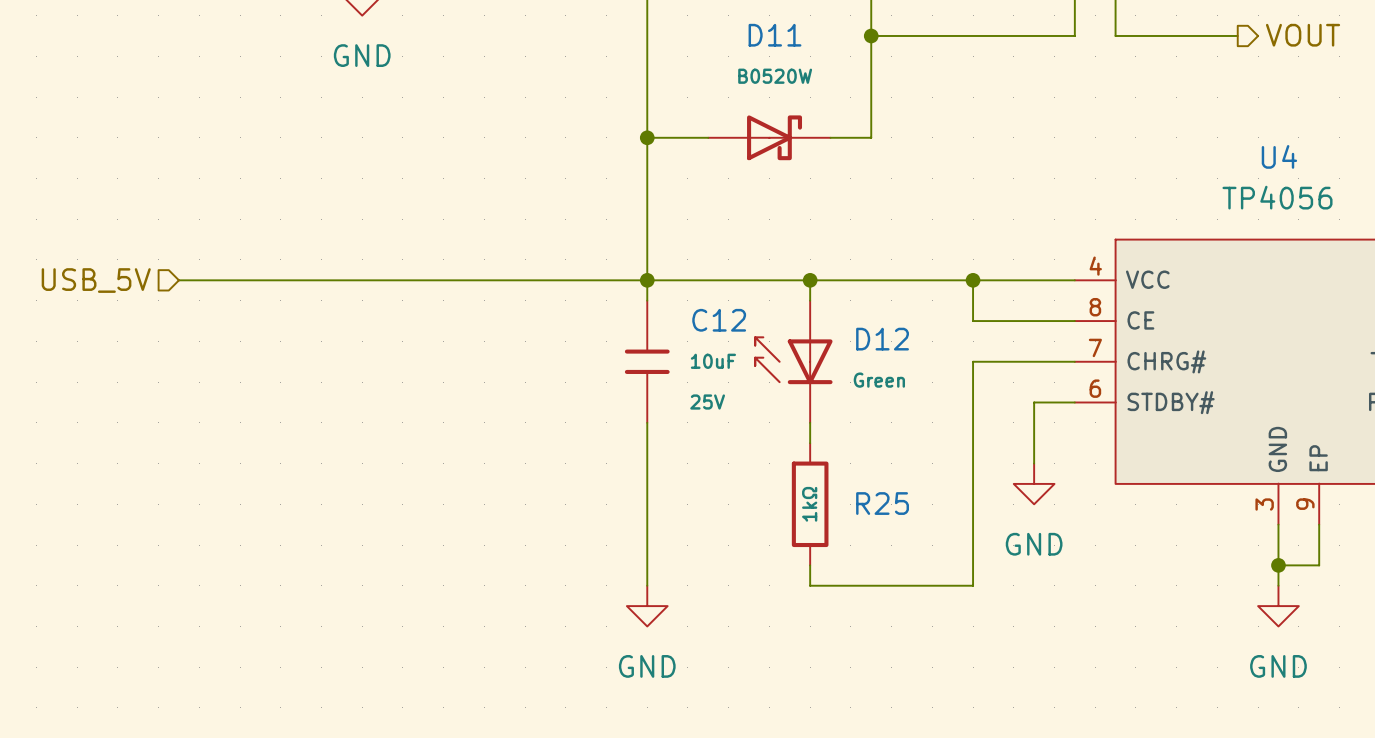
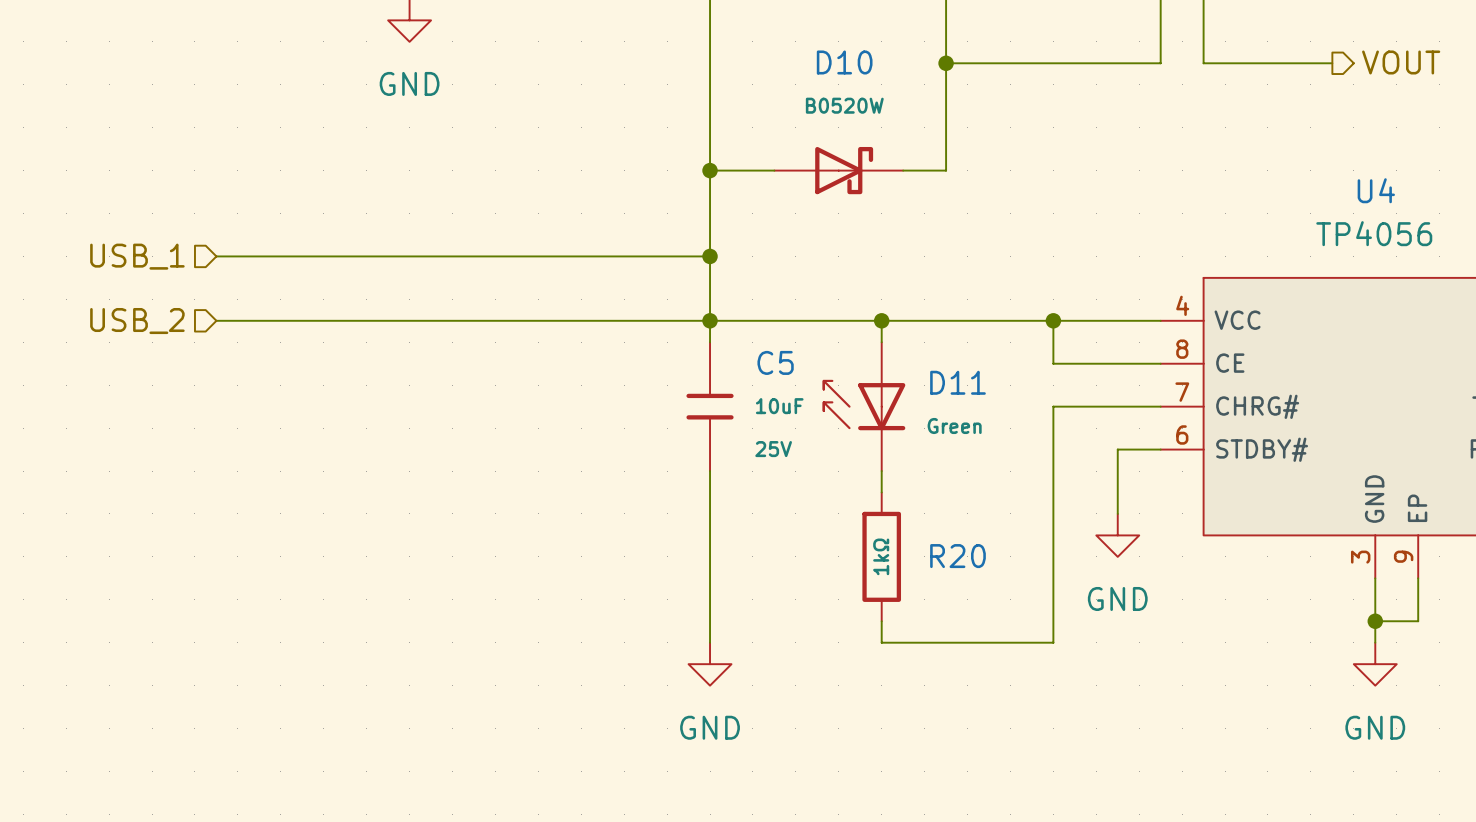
D11 name: D11 (775, 35) -> D10 (844, 62)
hierarchical label: none -> USB_1 (137, 256)
wire: none -> (216, 256) (710, 256)
junction: none -> (710, 256)
hierarchical label: USB_5V (96, 280) -> USB_2 (137, 321)
C12 name: C12 (719, 320) -> C5 (775, 362)
D12 name: D12 (882, 339) -> D11 (957, 382)
R25 name: R25 (882, 503) -> R20 (957, 556)

